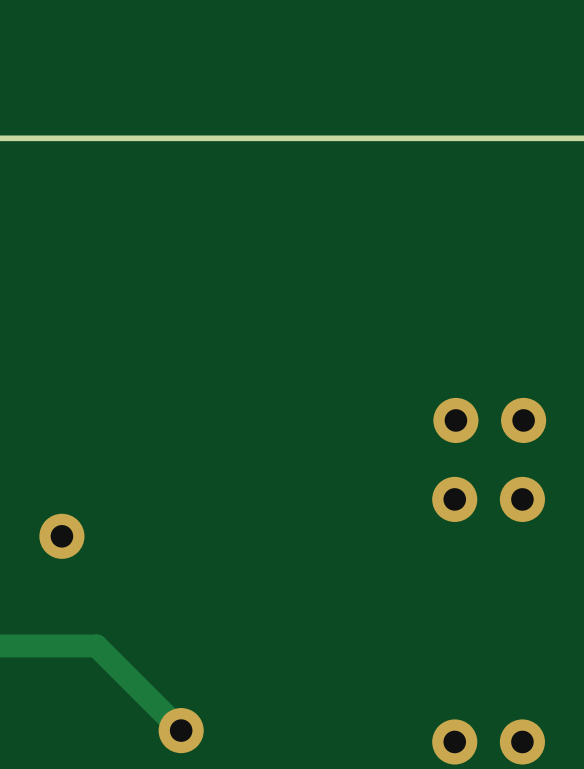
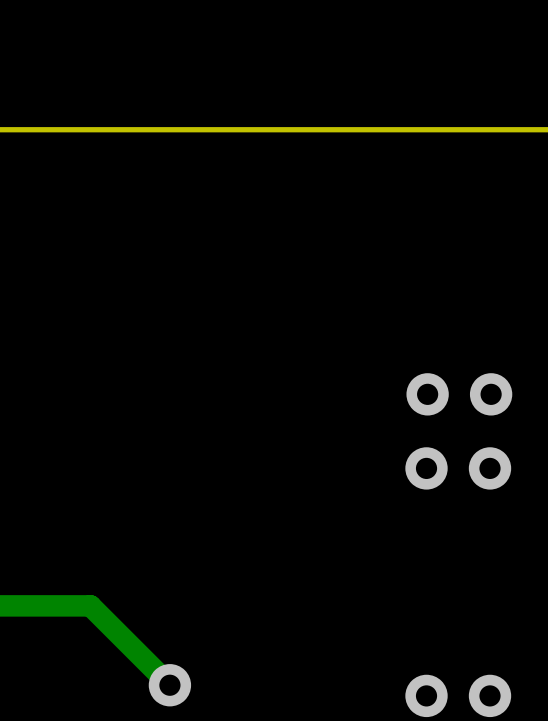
via: (61, 536) -> none

